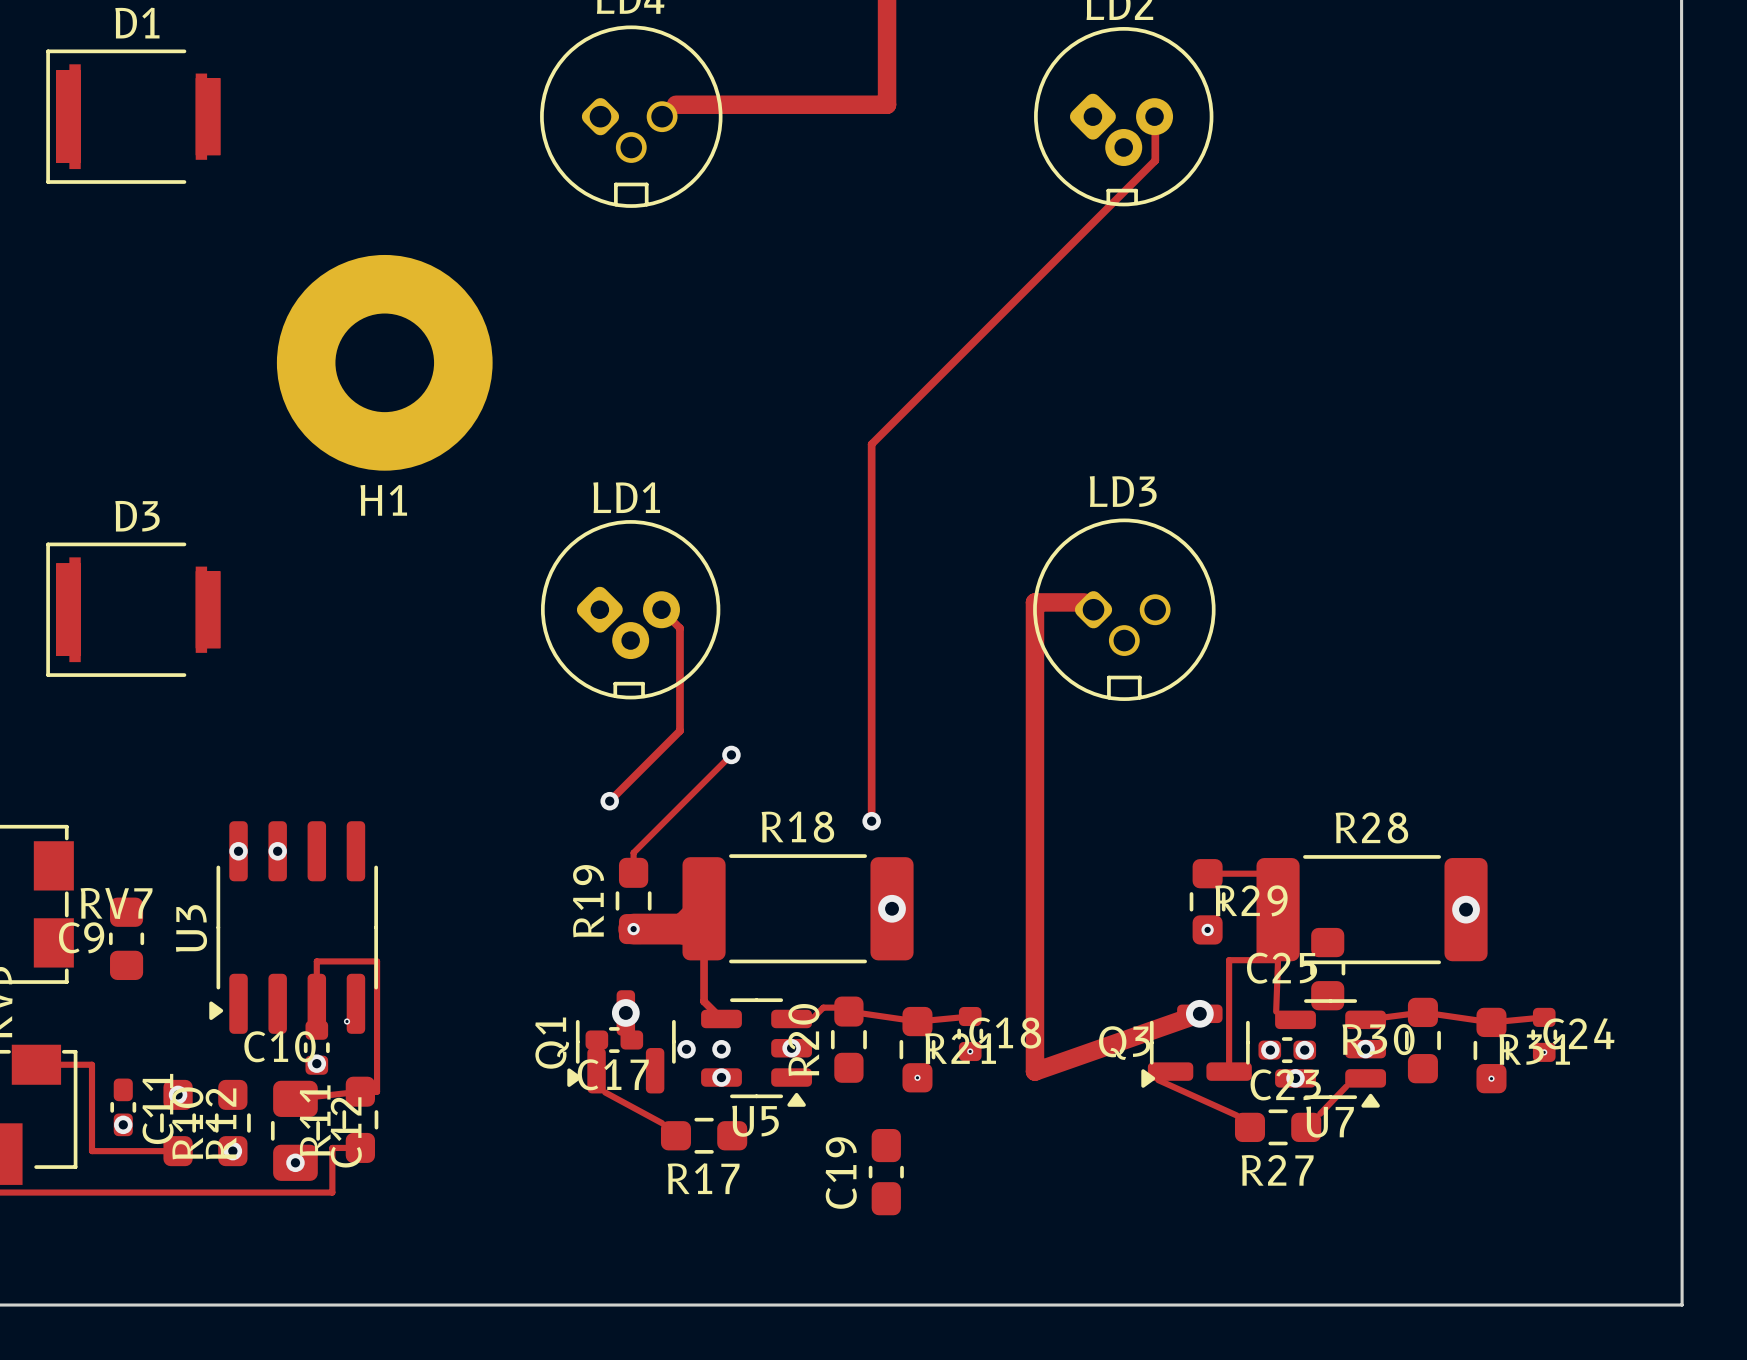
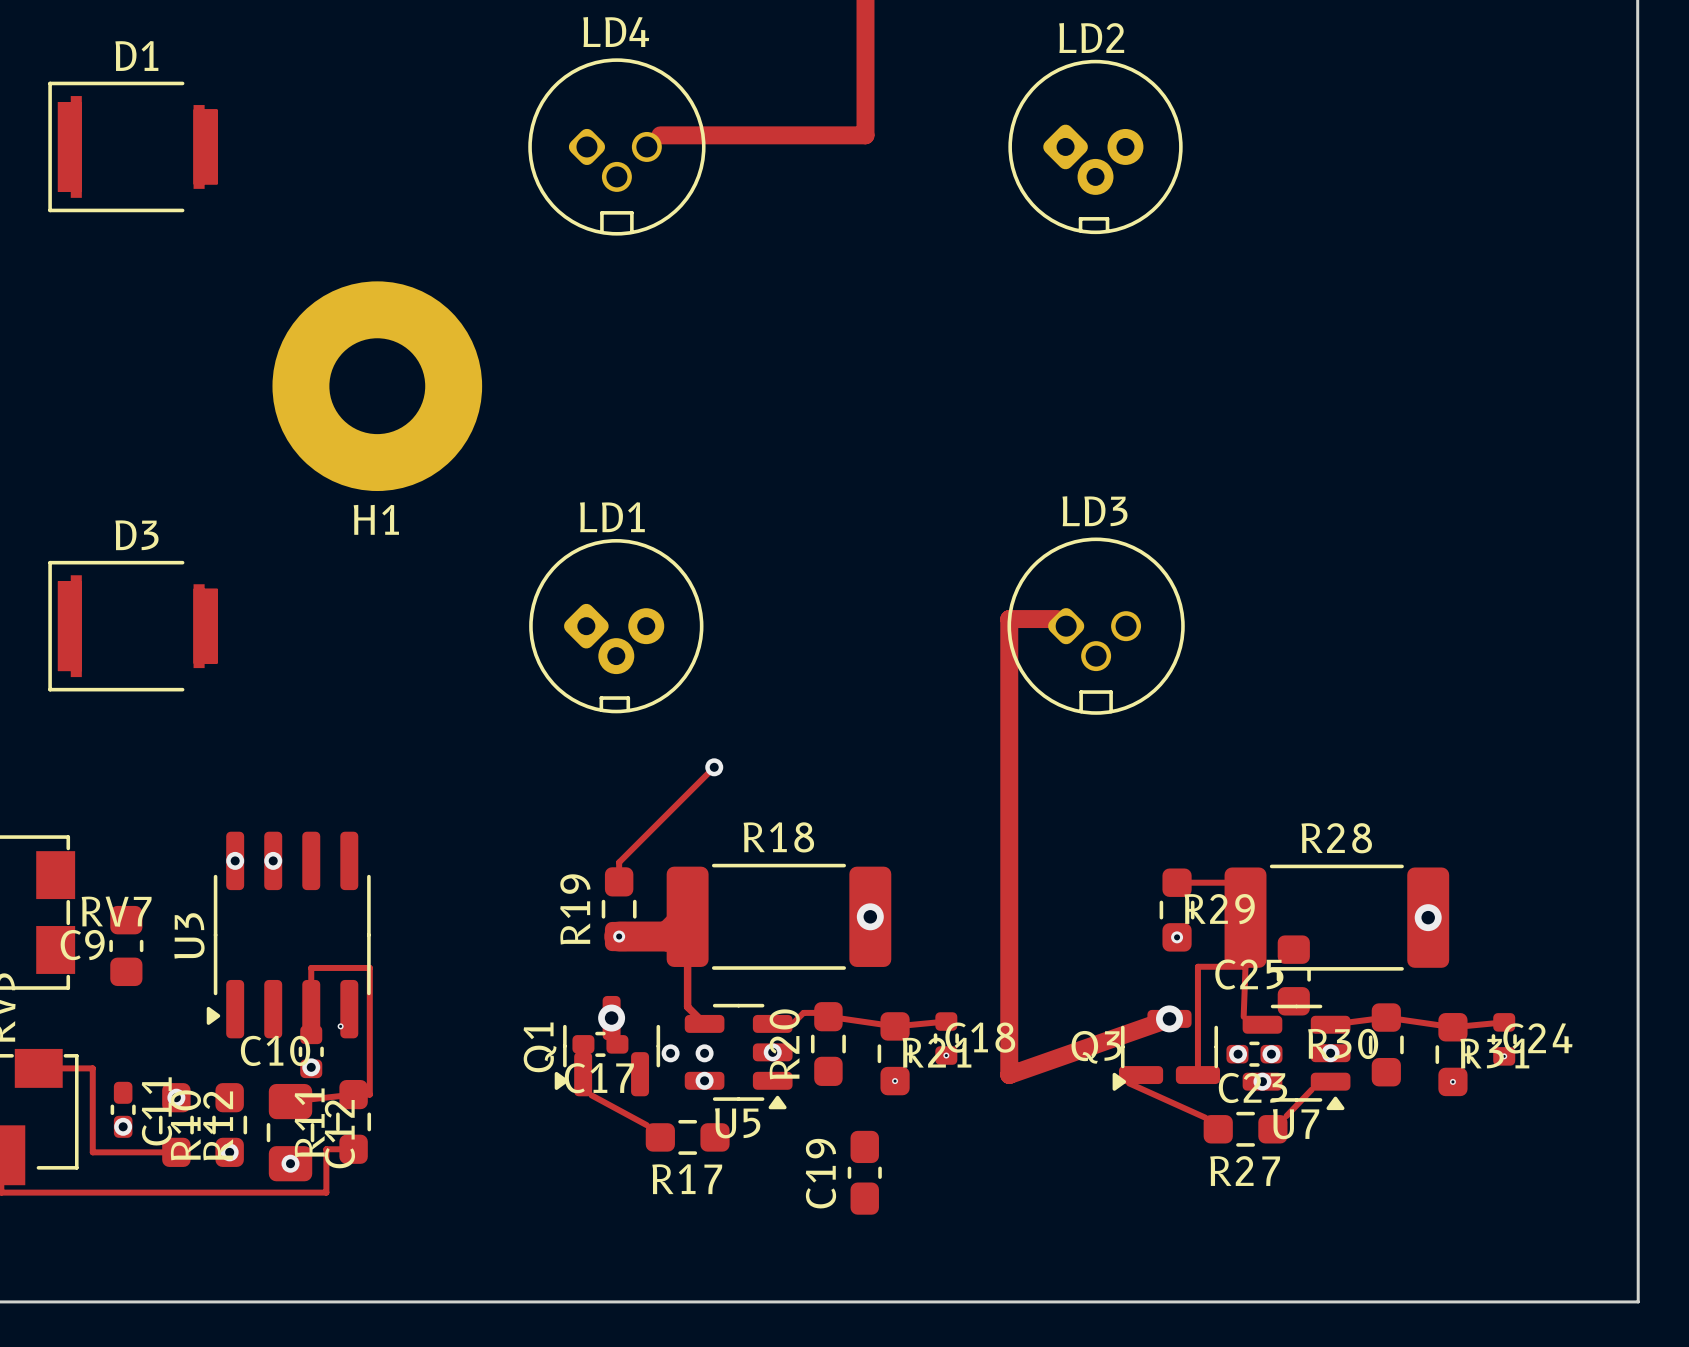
track: (1154, 116) (1155, 160) (871, 444) (871, 821) -> none
track: (661, 609) (679, 628) (679, 730) (609, 801) -> none
via: (609, 801) -> none
via: (871, 821) -> none

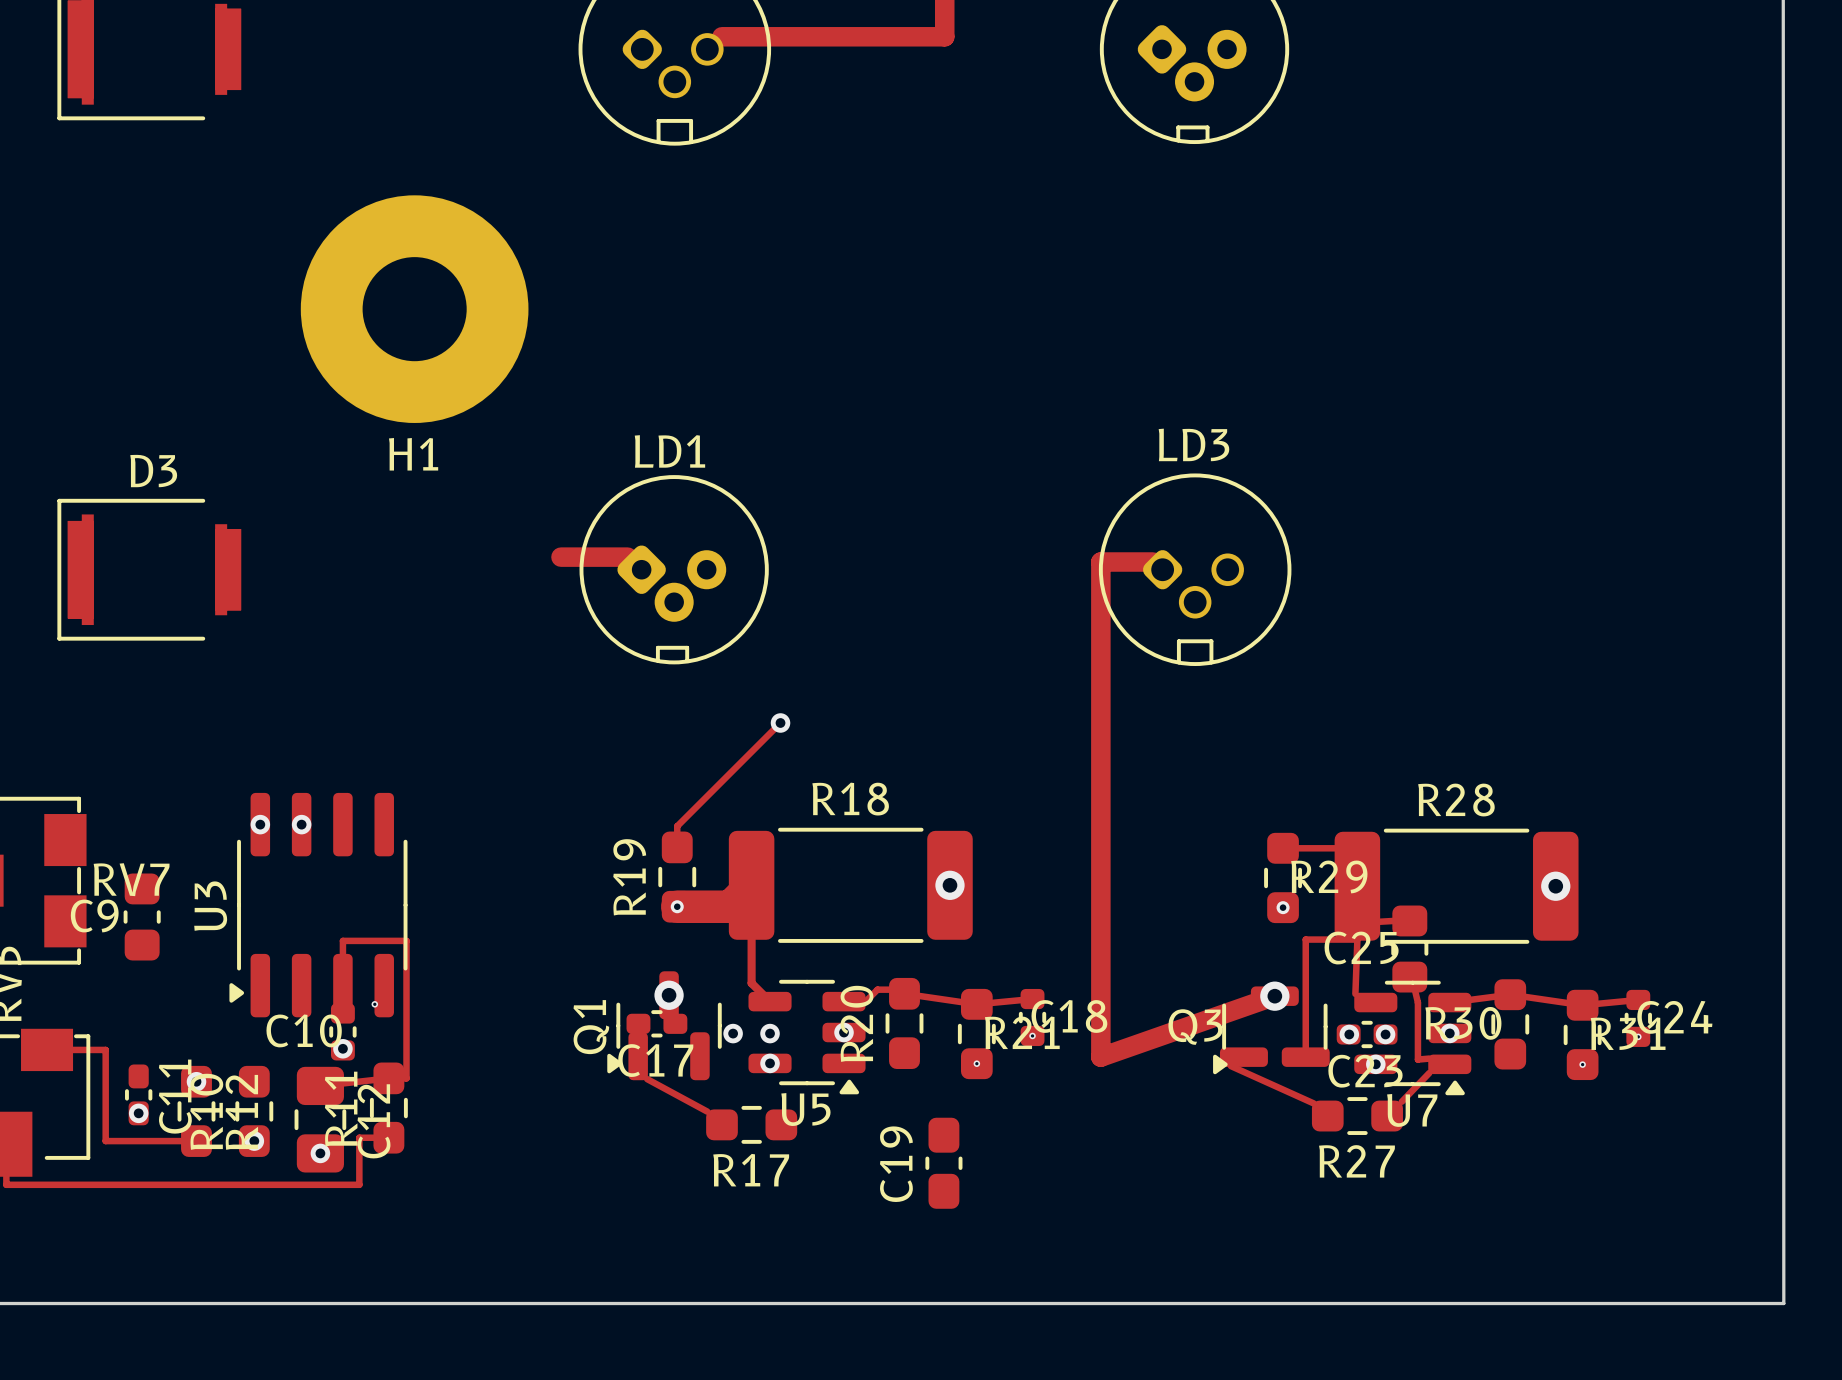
track: none -> (560, 557) (627, 557)
track: none -> (1393, 920) (1379, 921)
track: none -> (1415, 991) (1417, 1002) (1417, 1059) (1429, 1058)

